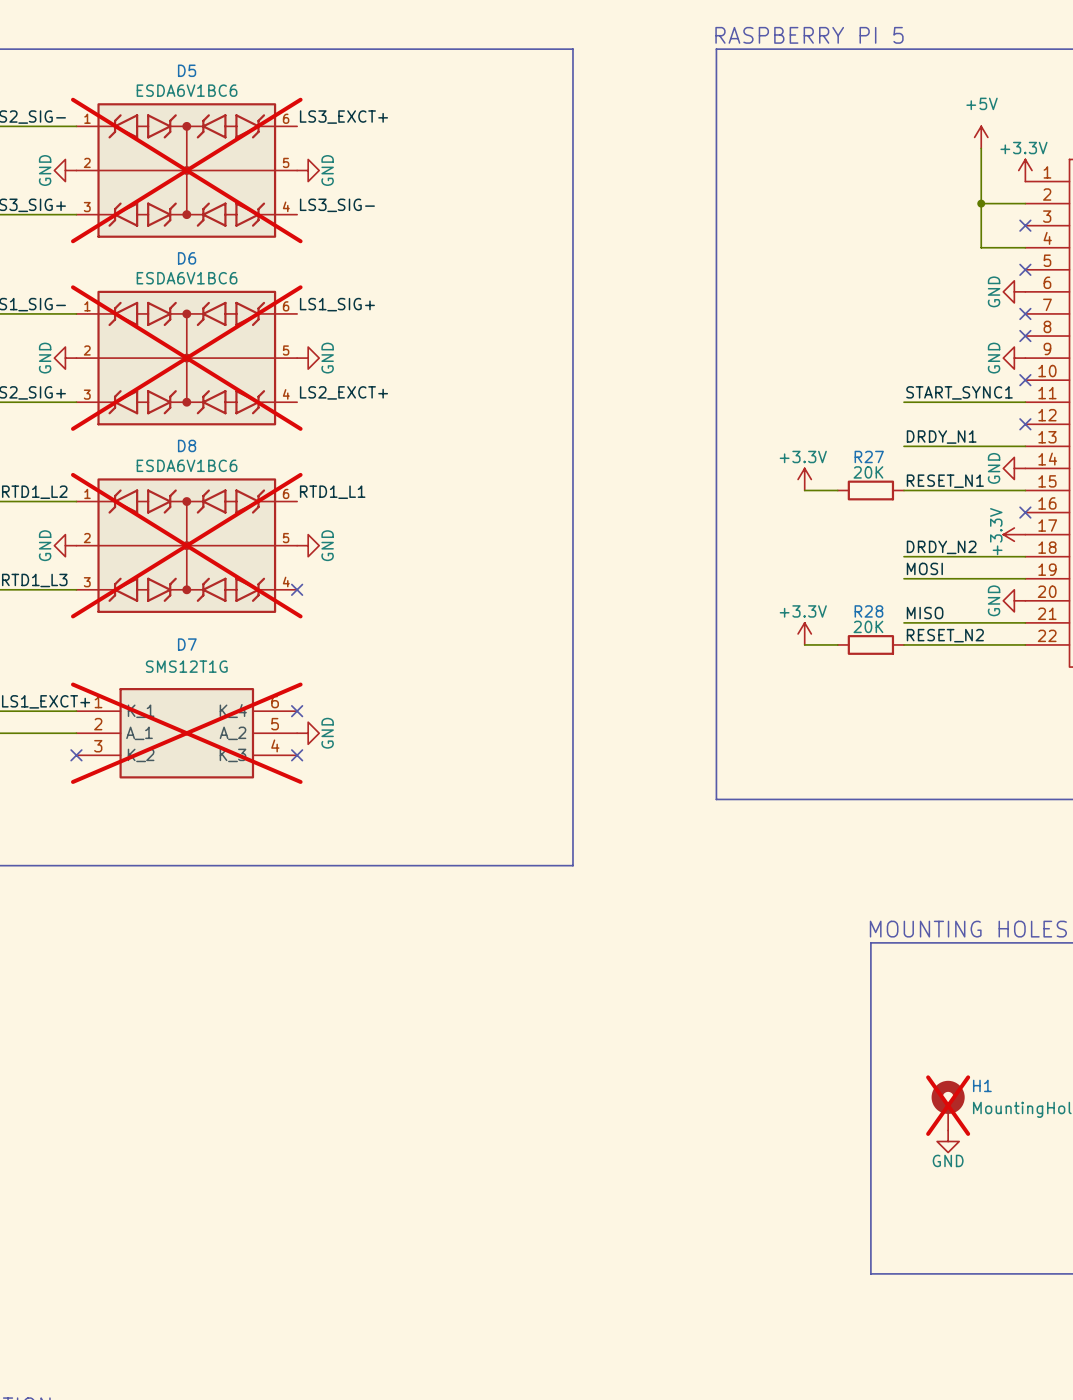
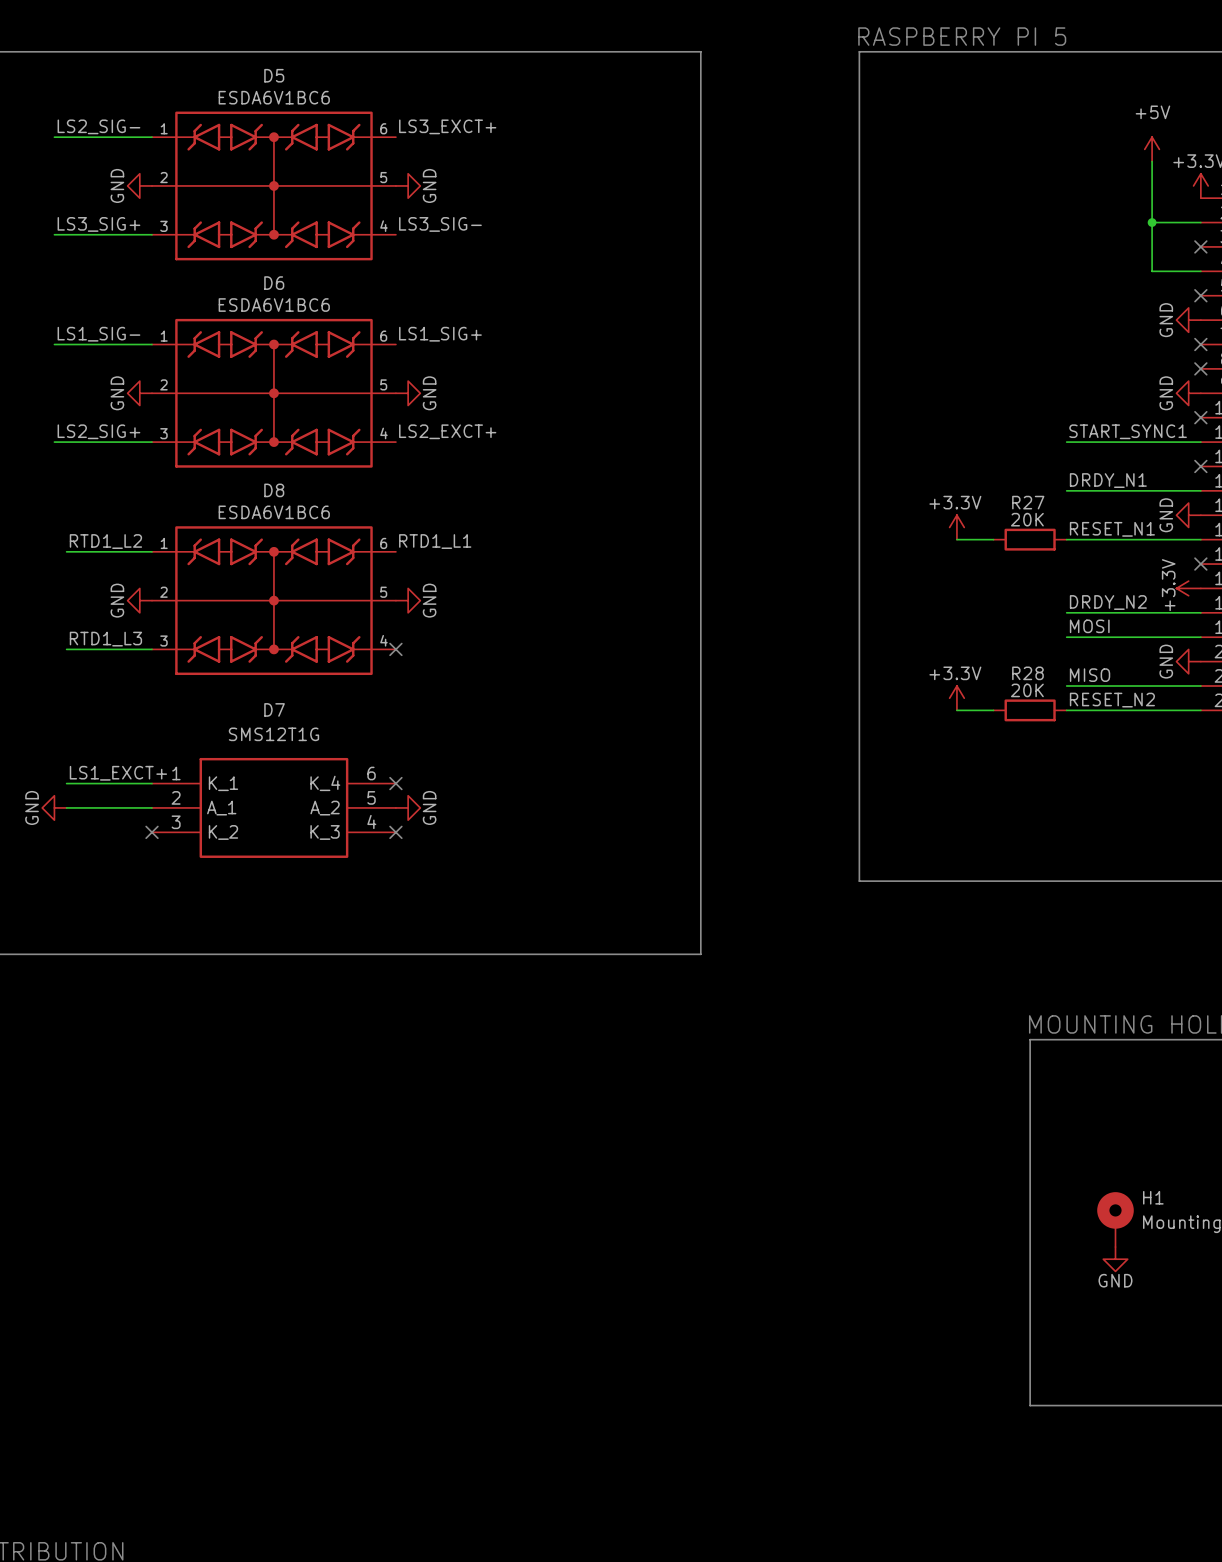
D5 do-not-place cross: (186, 170) -> none
D6 do-not-place cross: (186, 358) -> none
D8 do-not-place cross: (186, 545) -> none
D7 do-not-place cross: (186, 733) -> none
H1 do-not-place cross: (948, 1105) -> none

